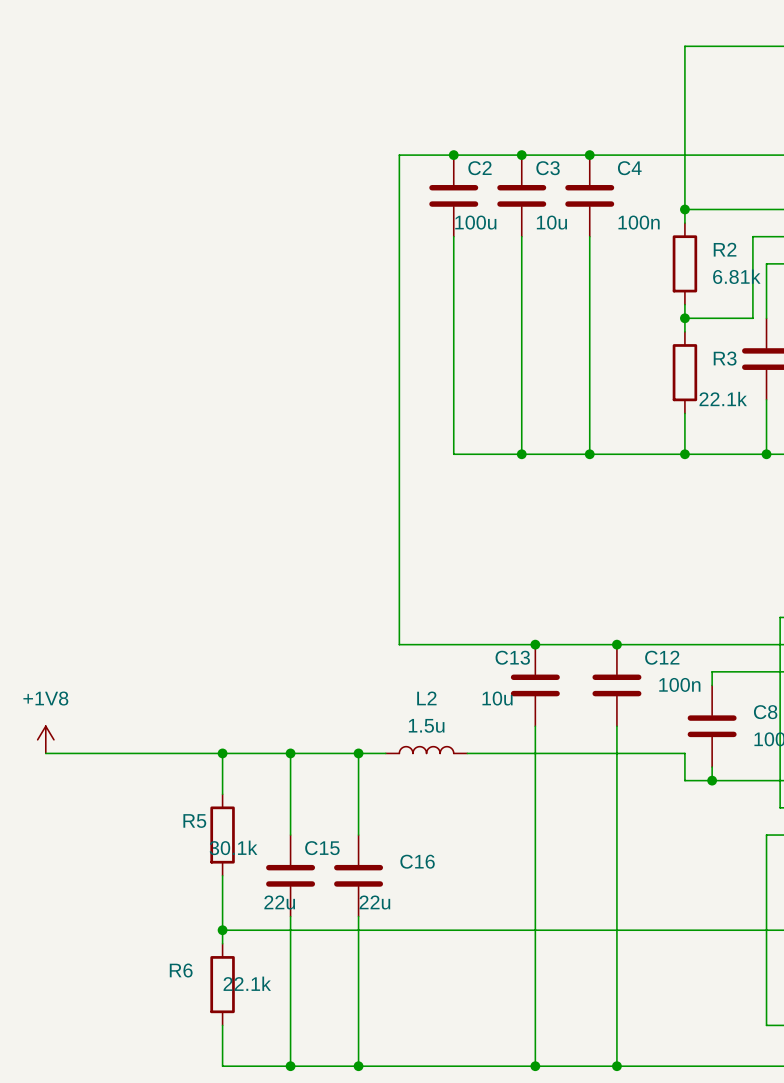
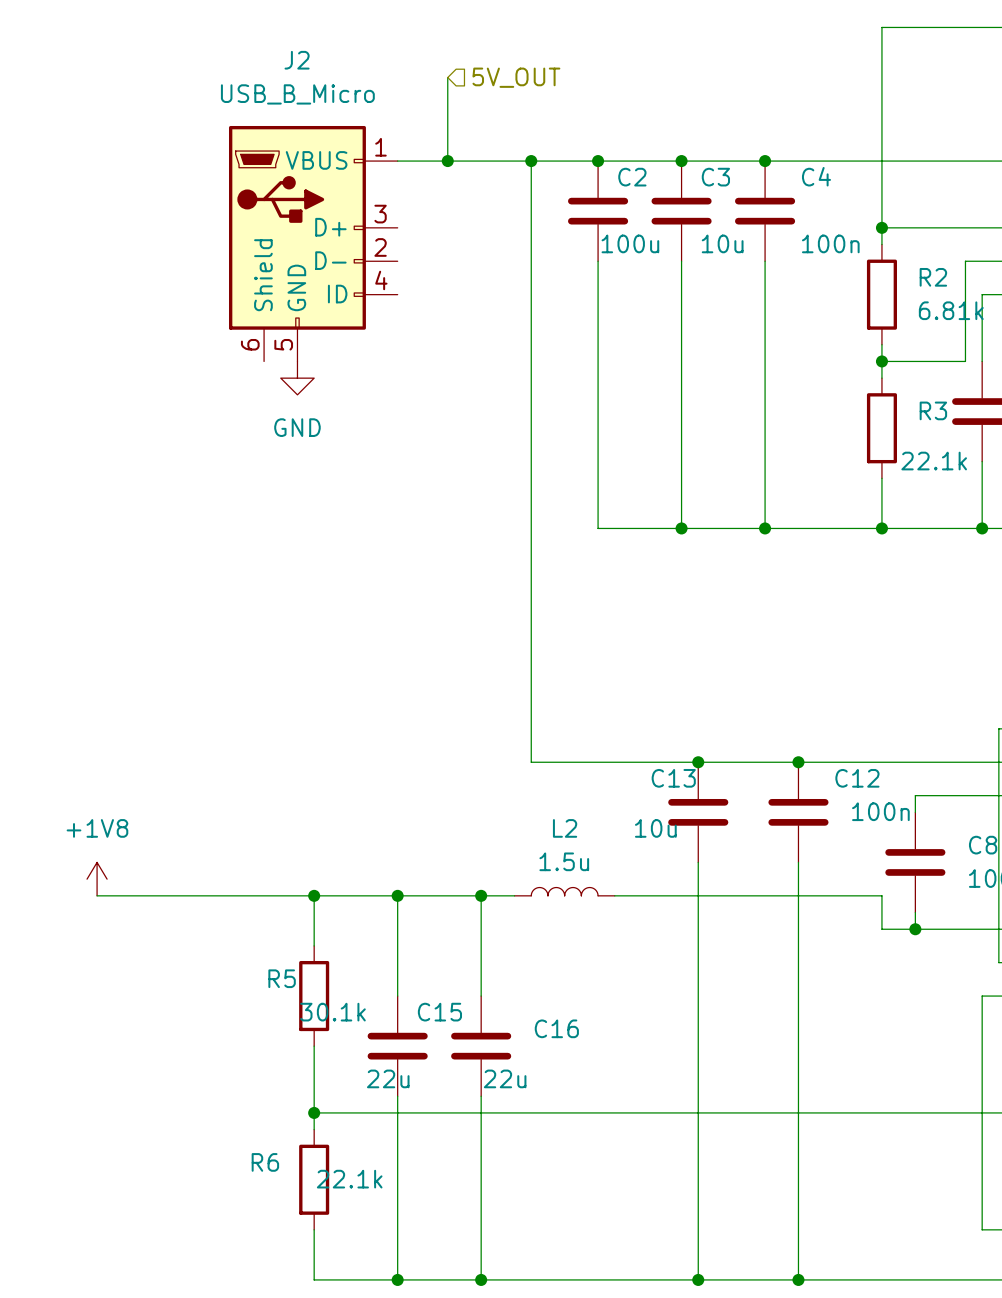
wire: none -> (447, 77) (447, 161)
hierarchical label: none -> 5V_OUT (516, 77)
wire: none -> (397, 161) (531, 161)
junction: none -> (447, 161)
junction: none -> (531, 161)
J2: none -> USB_B_Micro (313, 243)
power symbol: none -> GND (297, 378)

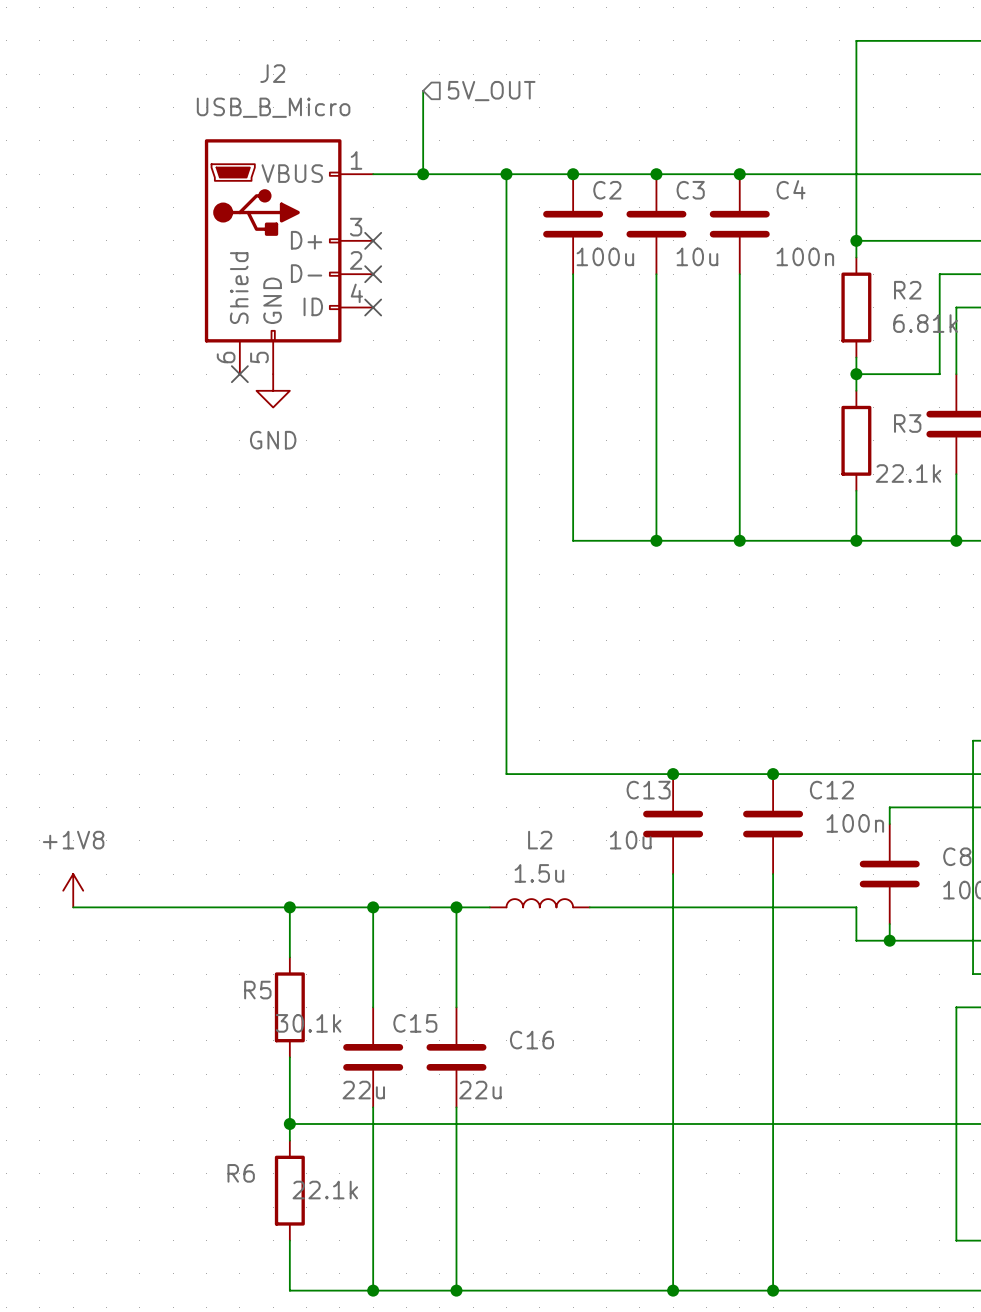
no-connect mark: none -> (373, 240)
no-connect mark: none -> (373, 274)
no-connect mark: none -> (373, 307)
no-connect mark: none -> (239, 374)

